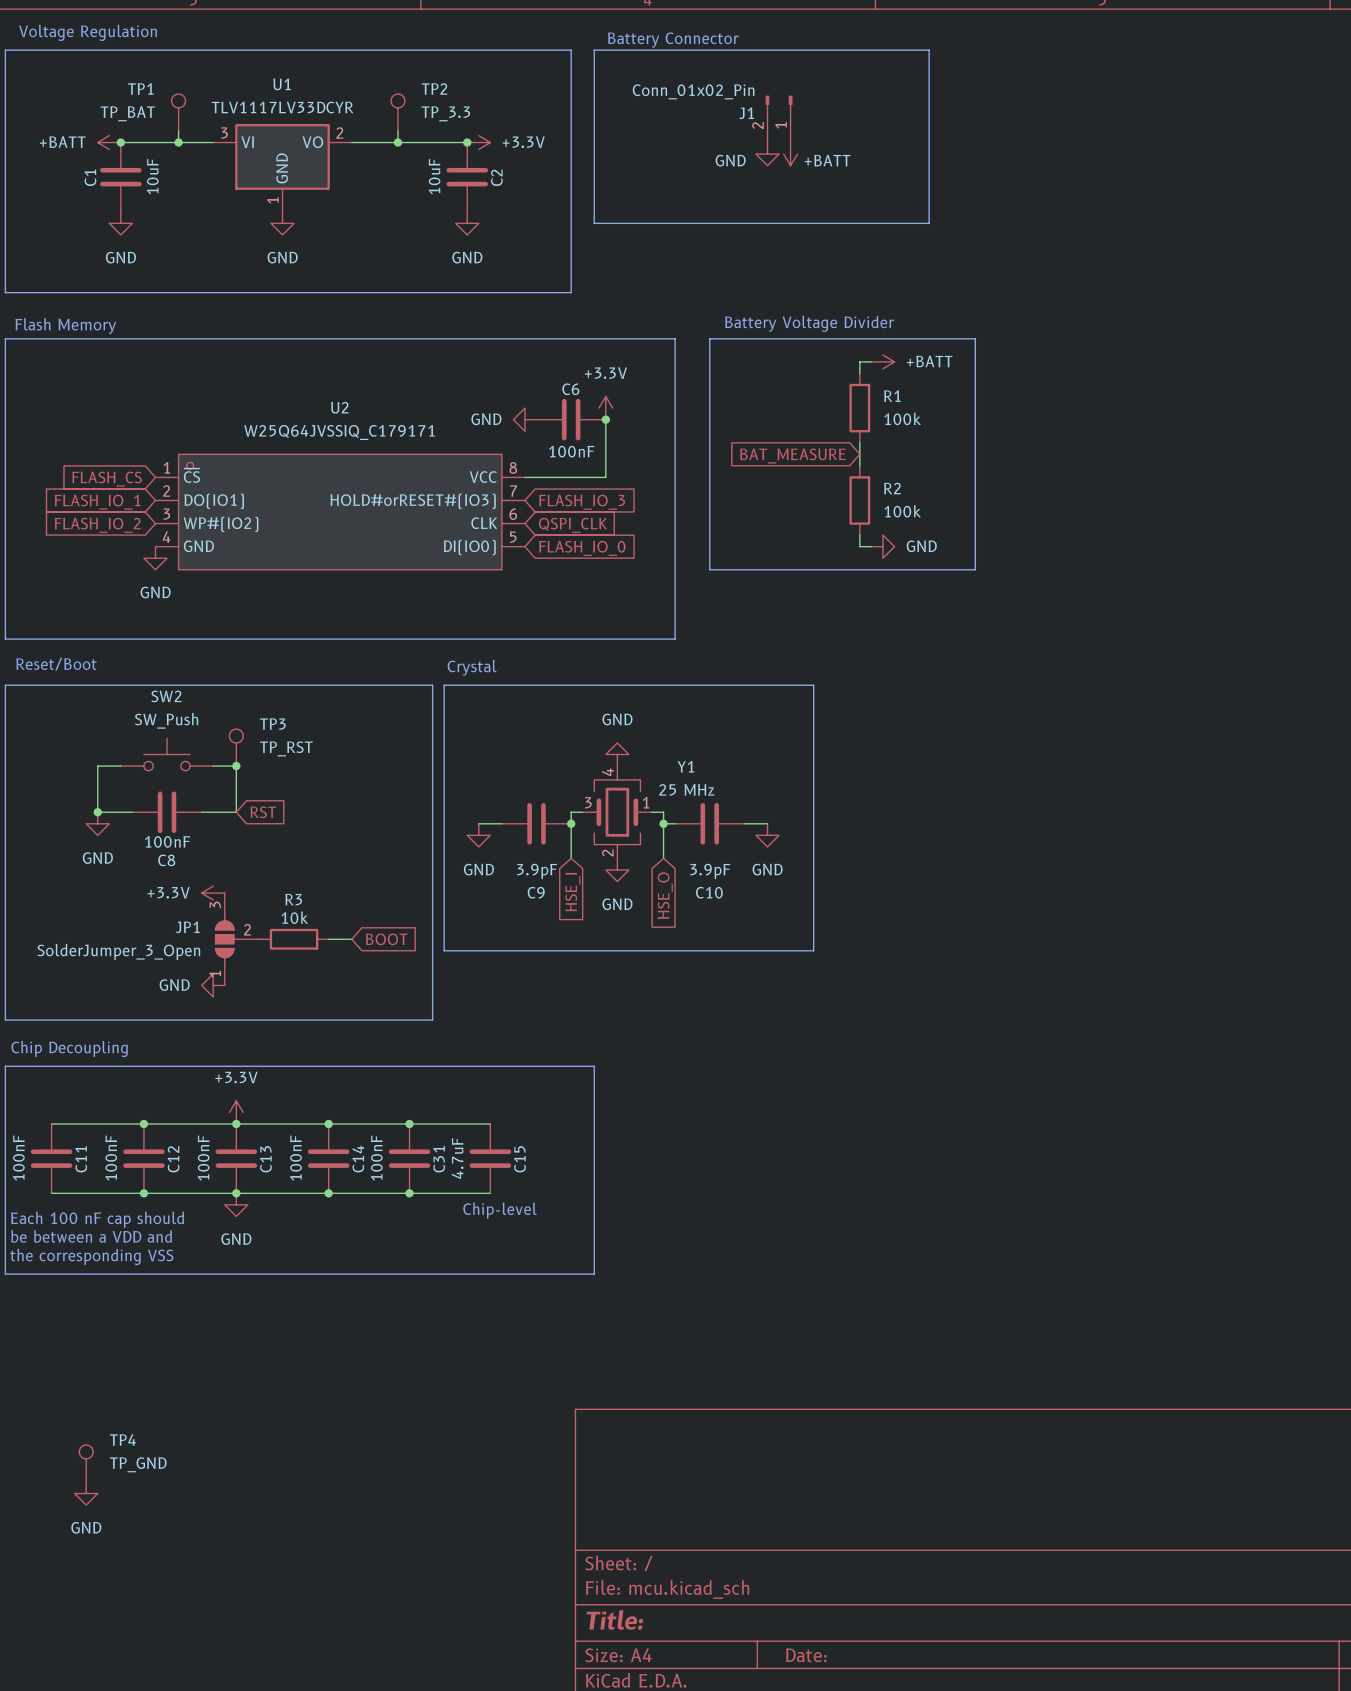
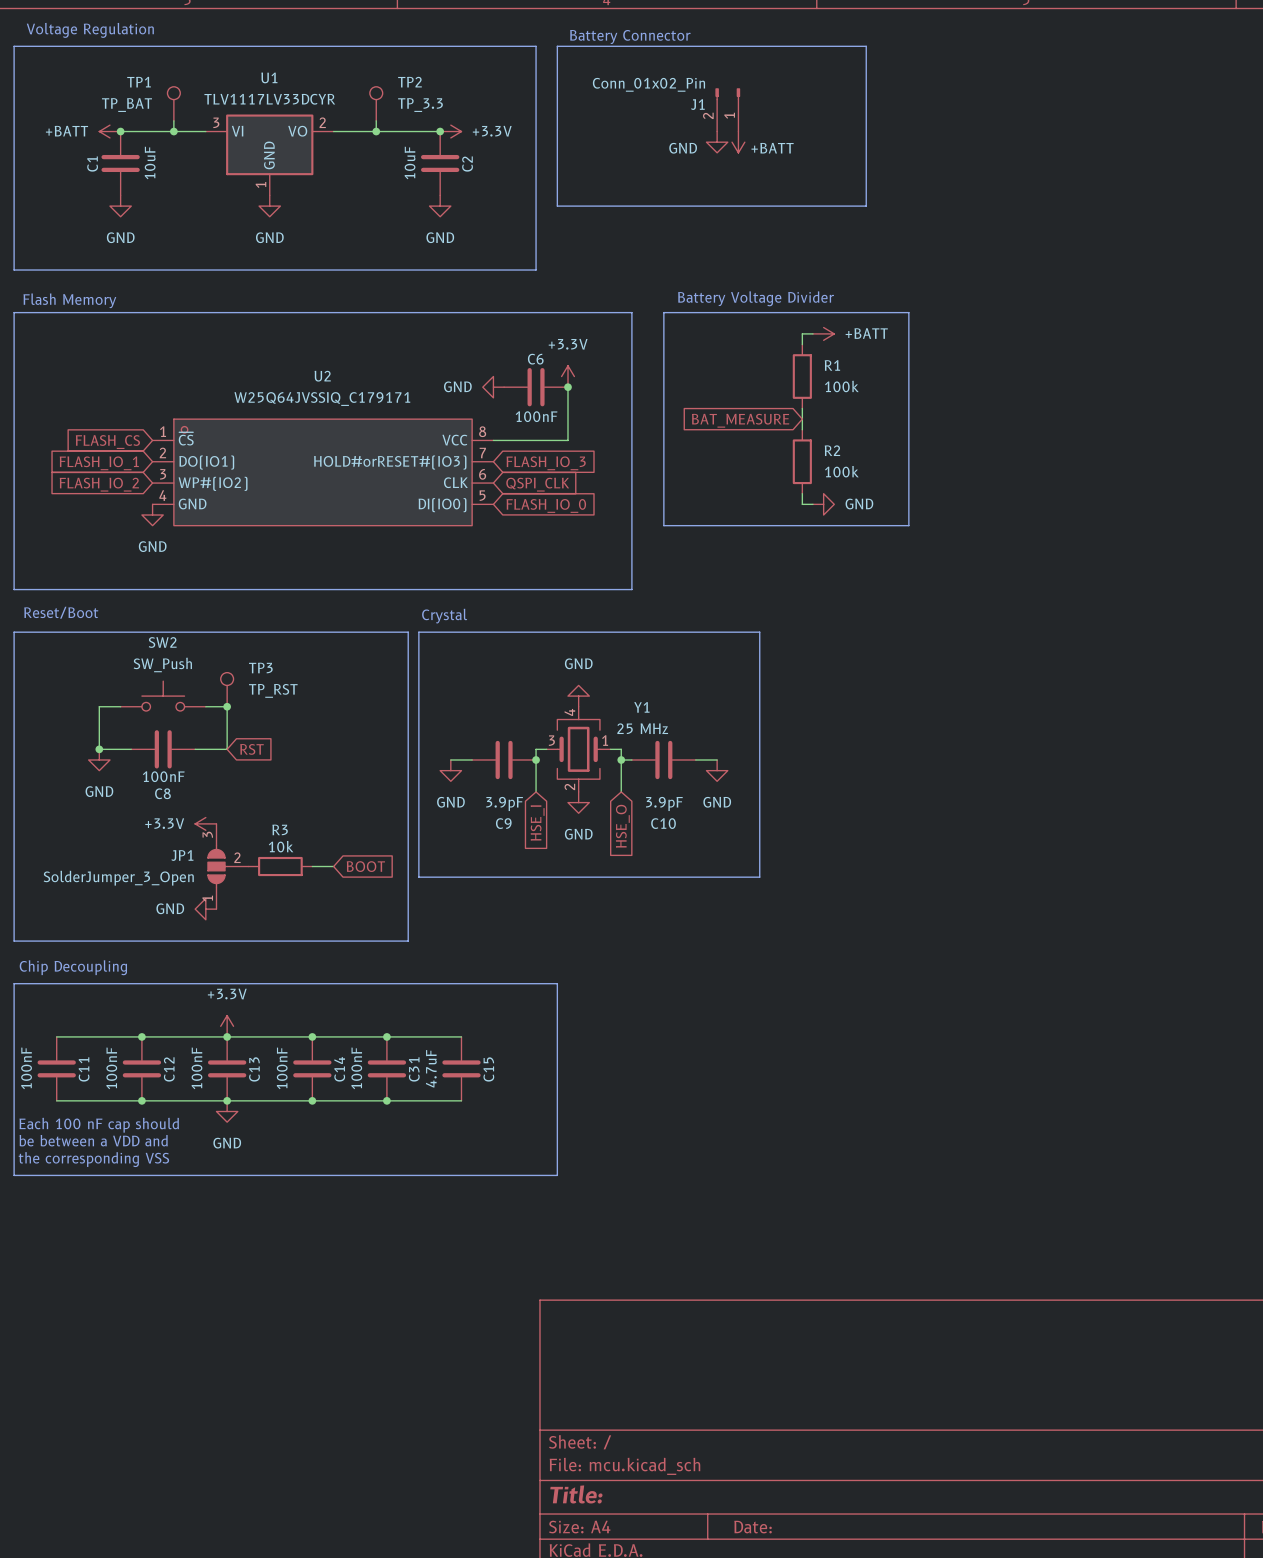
text: Chip-level (500, 1210) -> none
TP4: TP_GND (86, 1463) -> none
power symbol: GND (86, 1493) -> none

